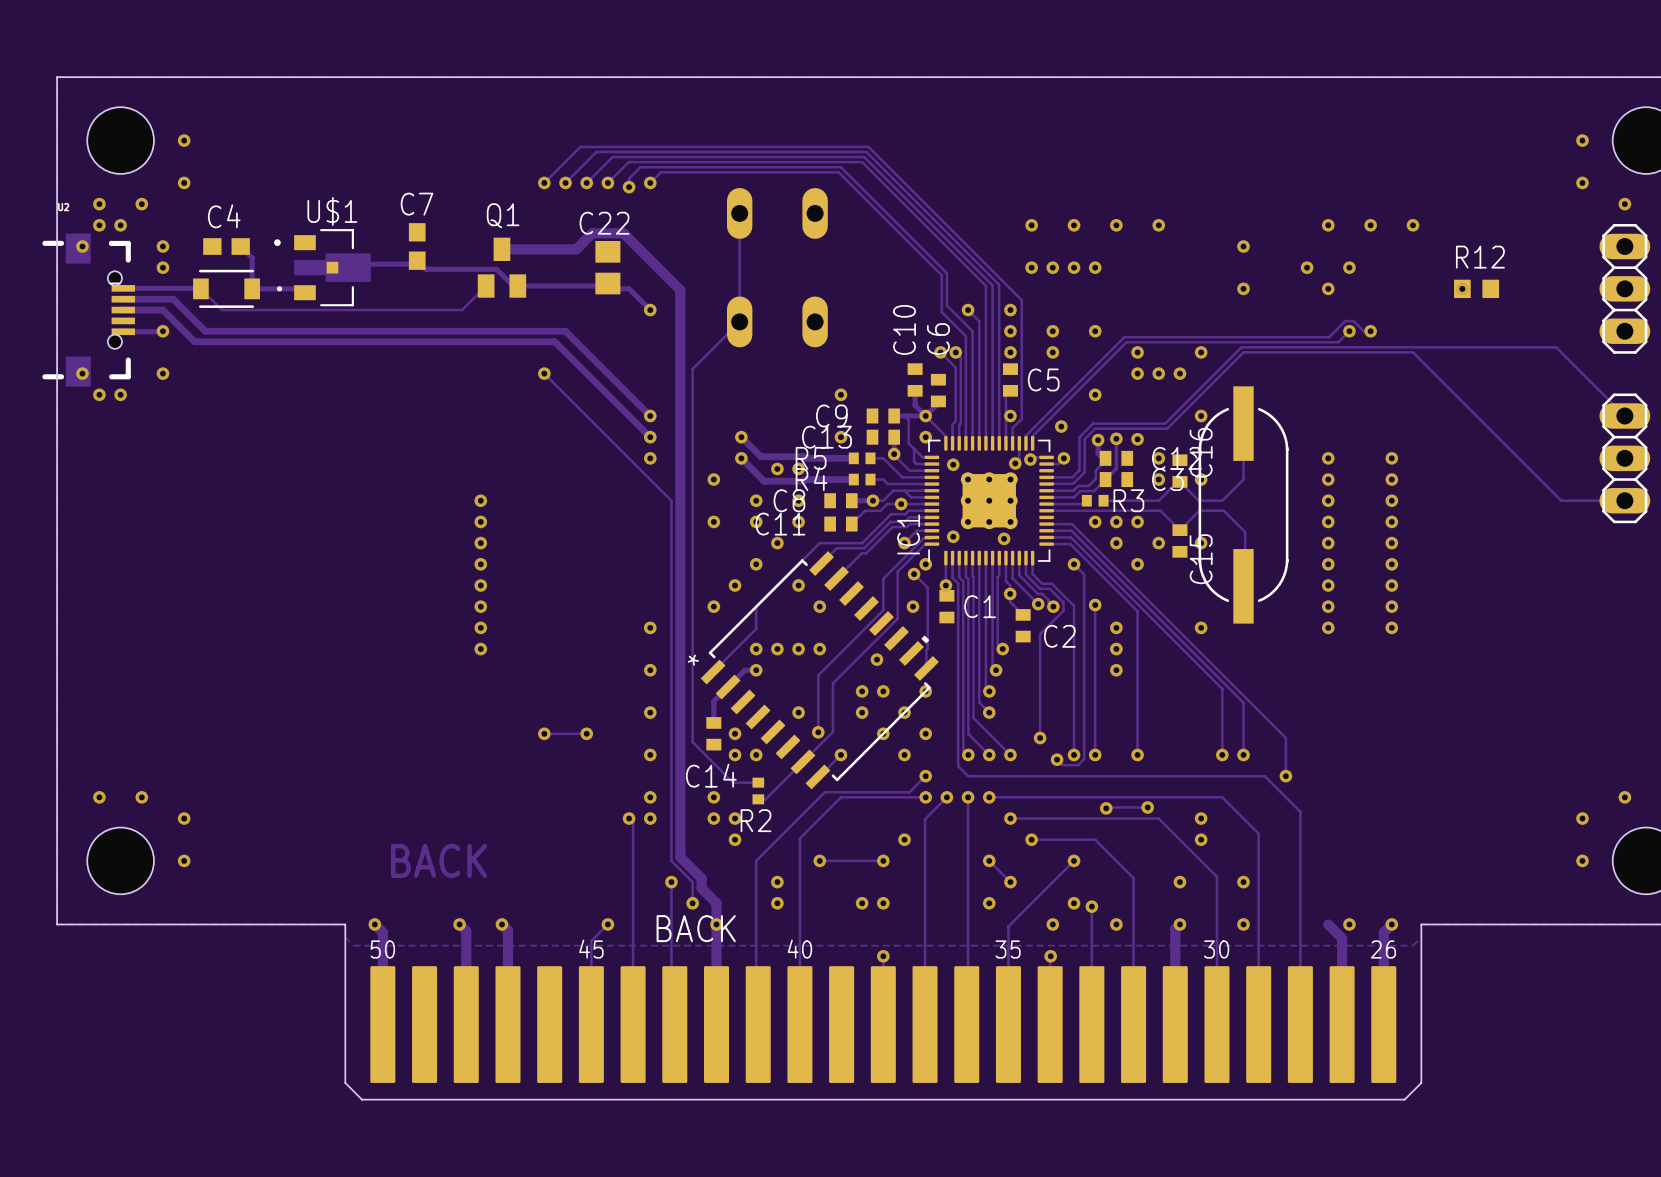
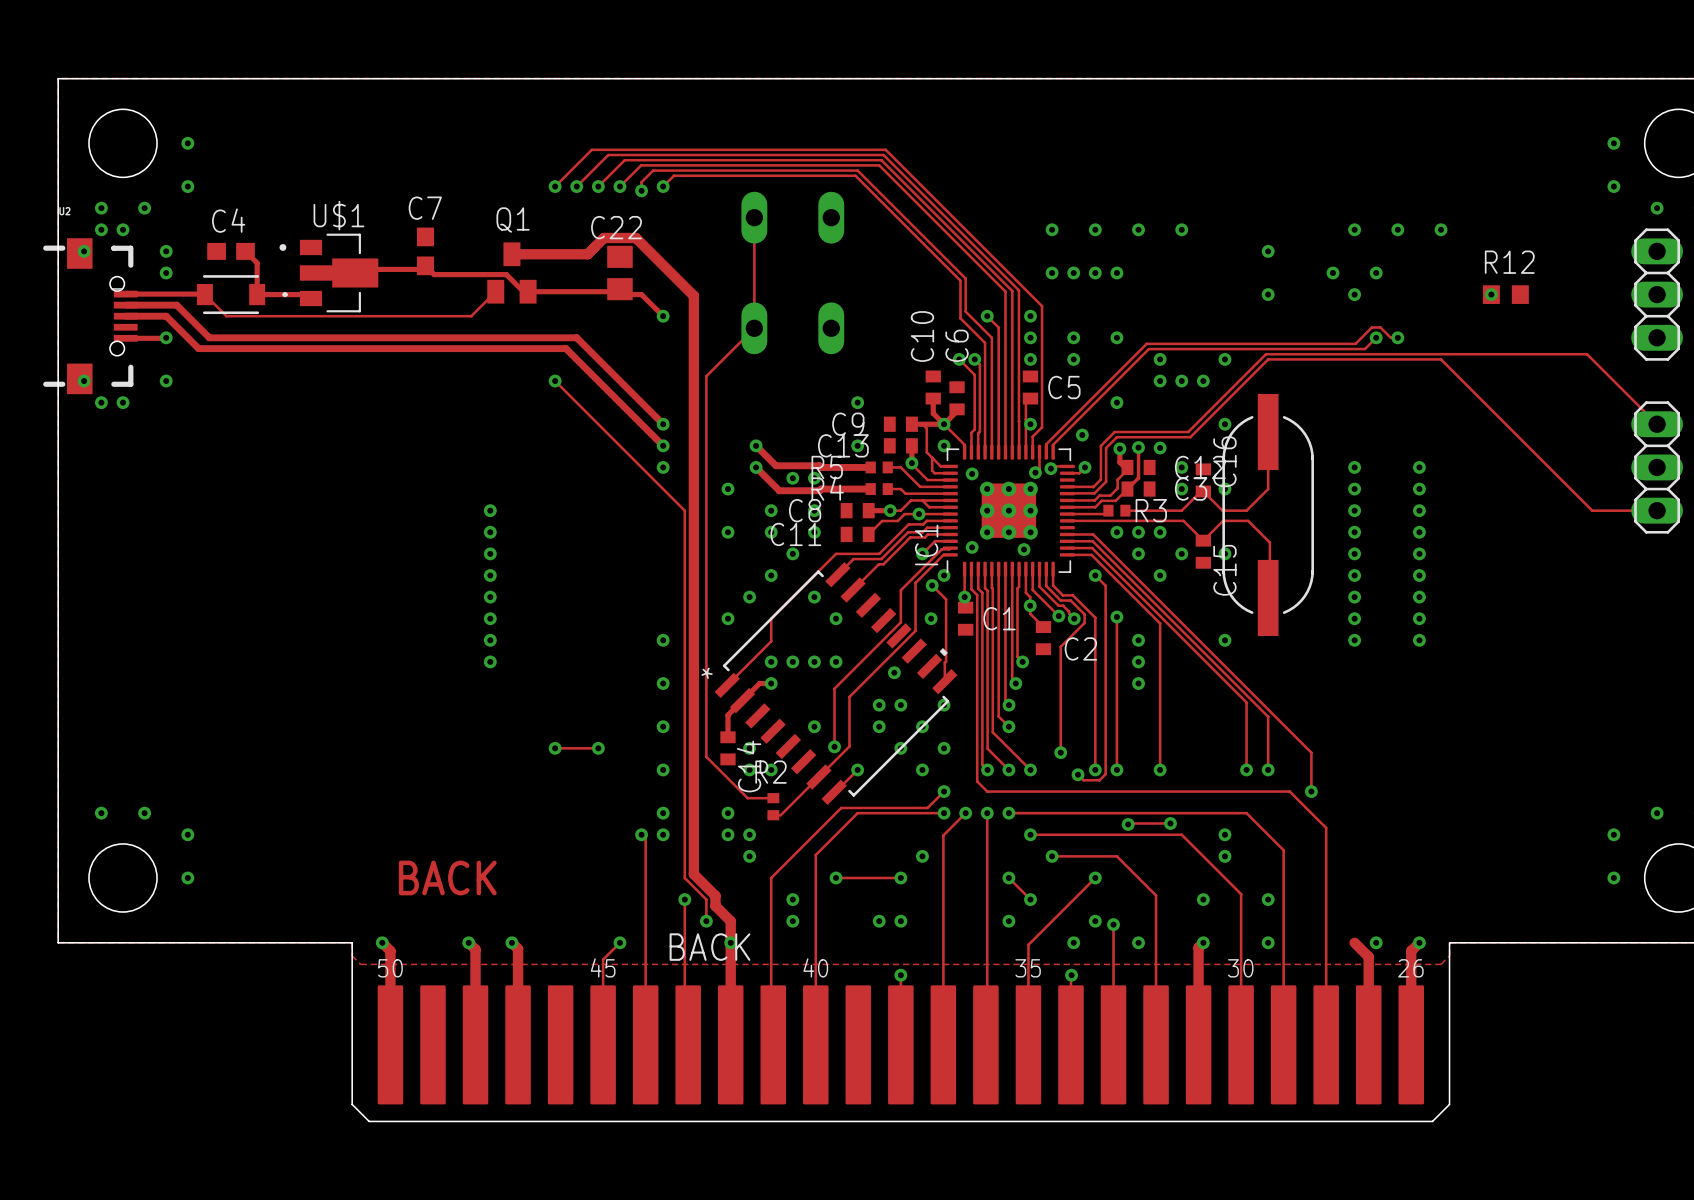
C14 name rotation: 0° (711, 775) -> 90° counterclockwise (749, 766)
R2 name position: R2 (756, 820) -> R2 (771, 772)

